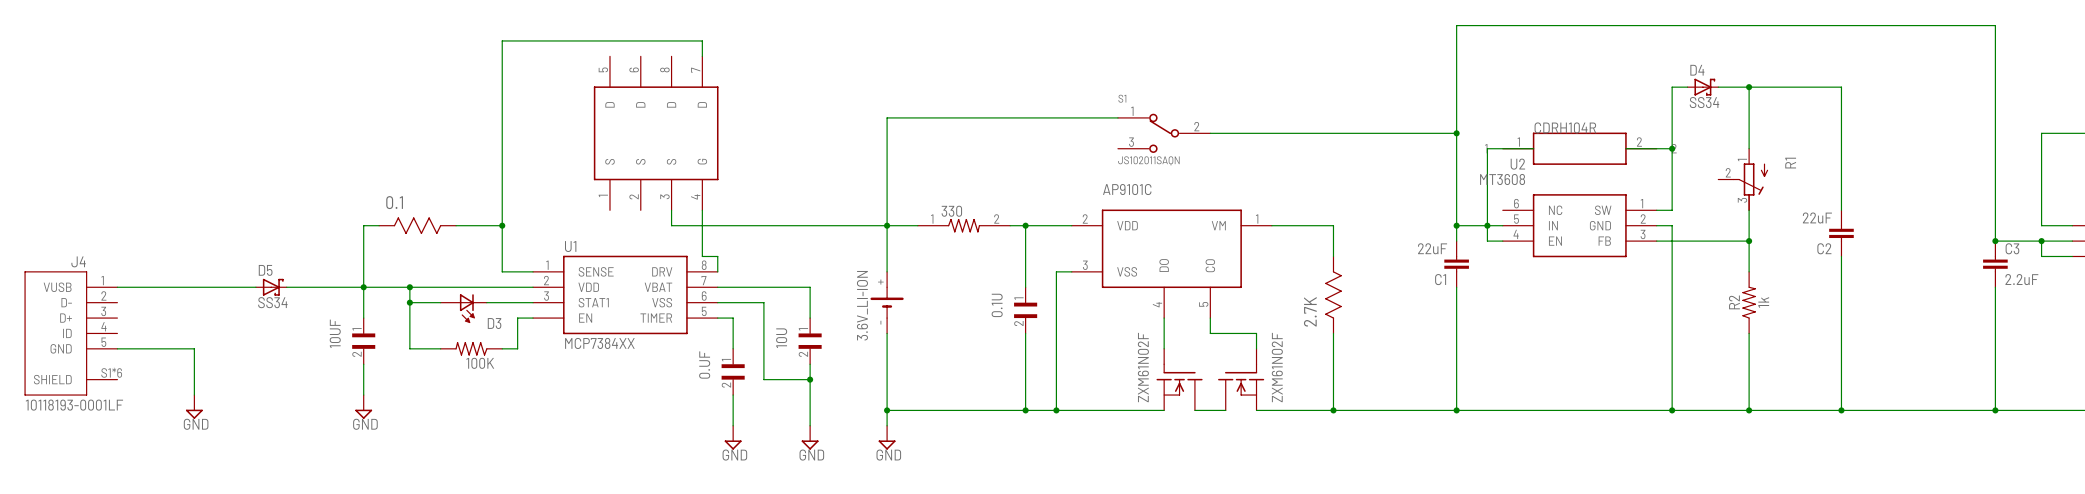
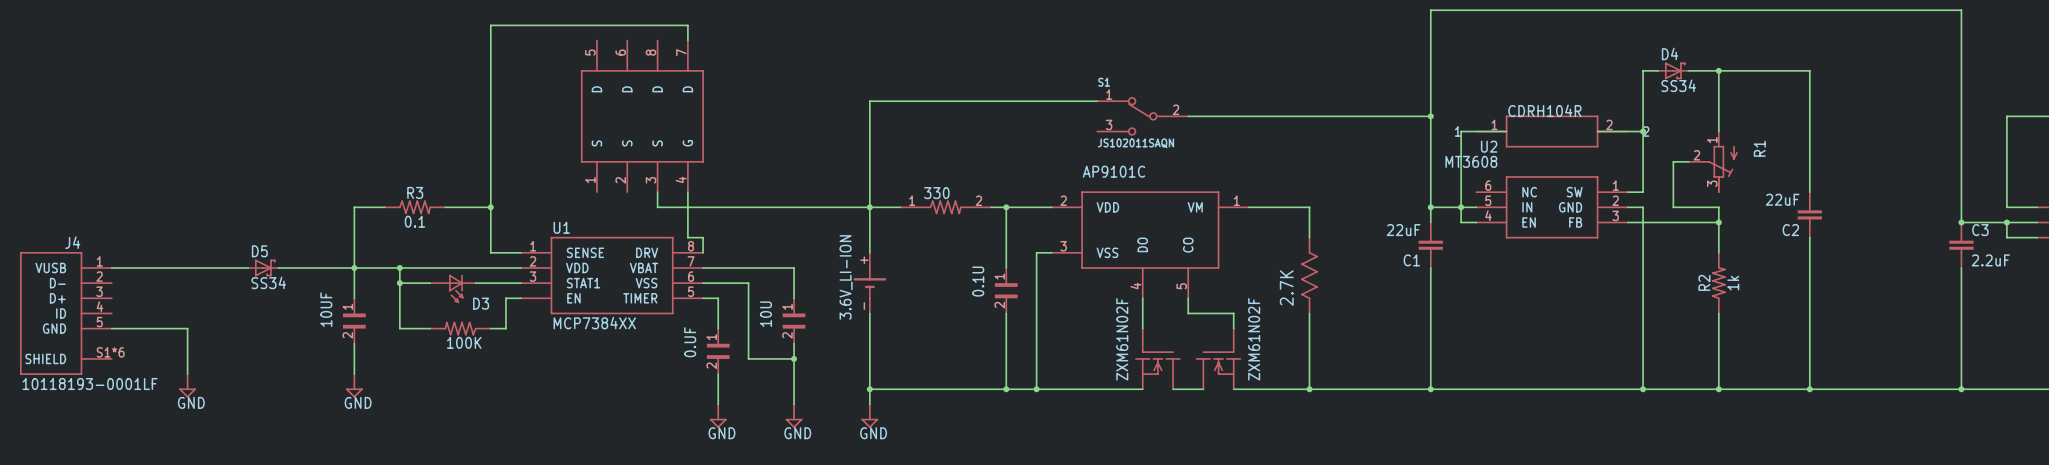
wire: (1749, 210) (1749, 225) -> (1688, 161) (1673, 161) (1673, 207) (1718, 207)
0.1: (417, 225) -> none
R3: none -> 0.1 (415, 207)

